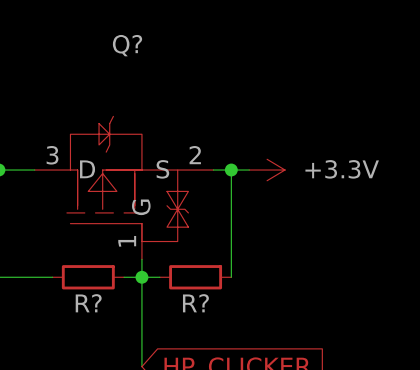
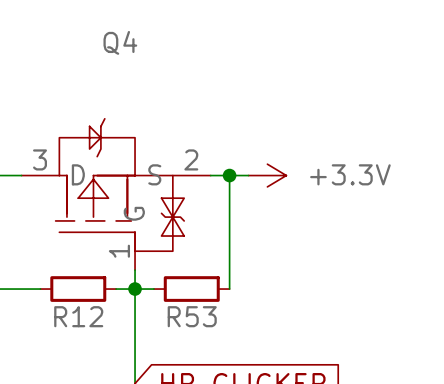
Q? name: Q? (127, 45) -> Q4 (120, 42)
R? name: R? (88, 303) -> R12 (78, 316)
R? name: R? (195, 303) -> R53 (192, 316)

